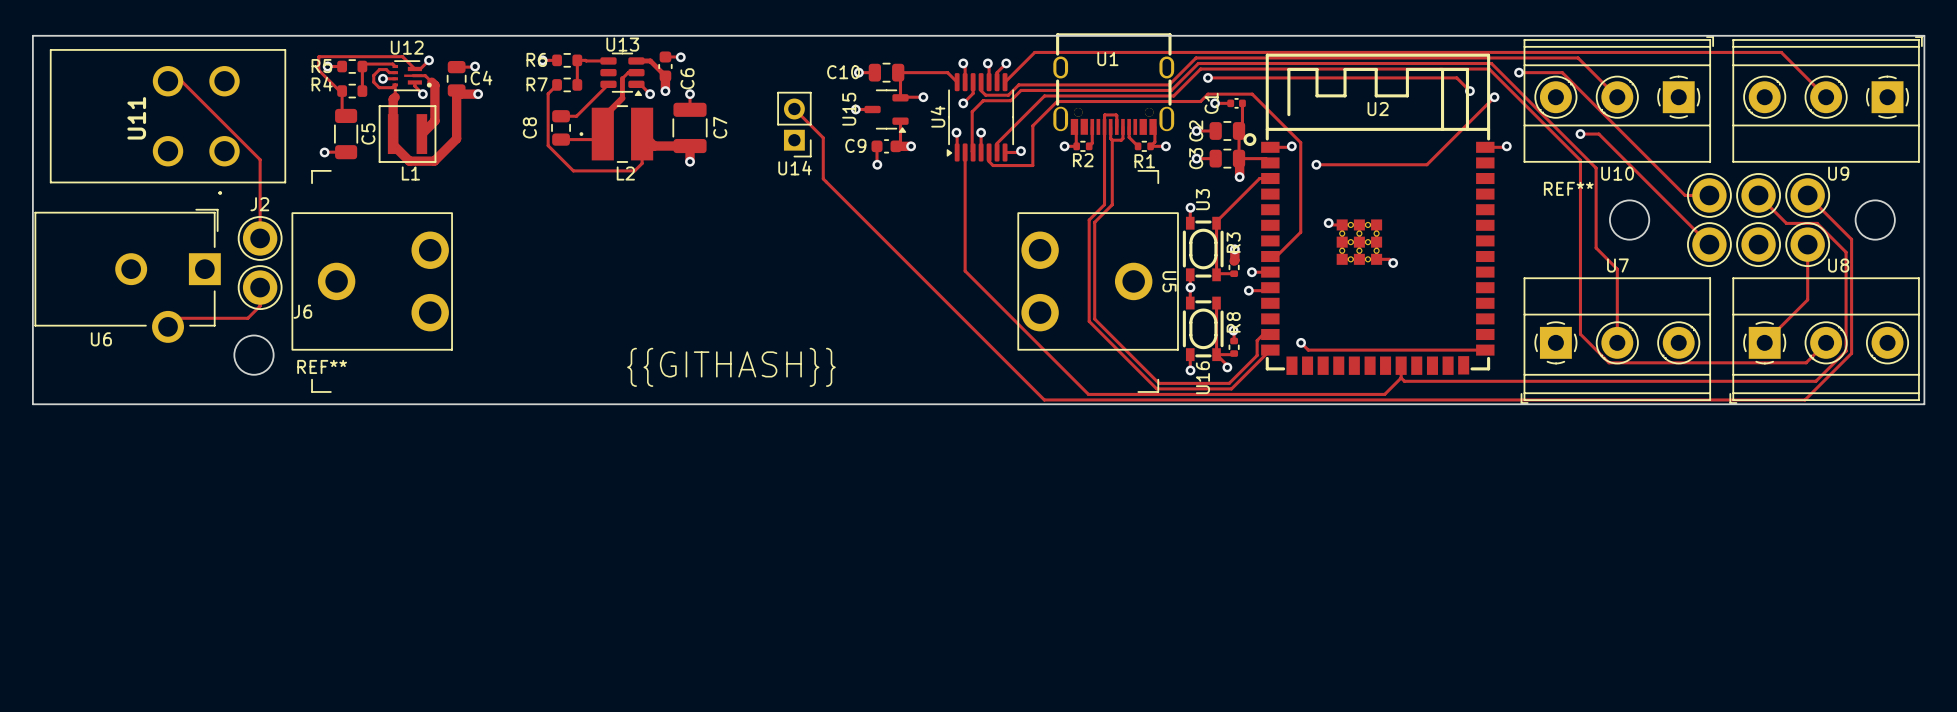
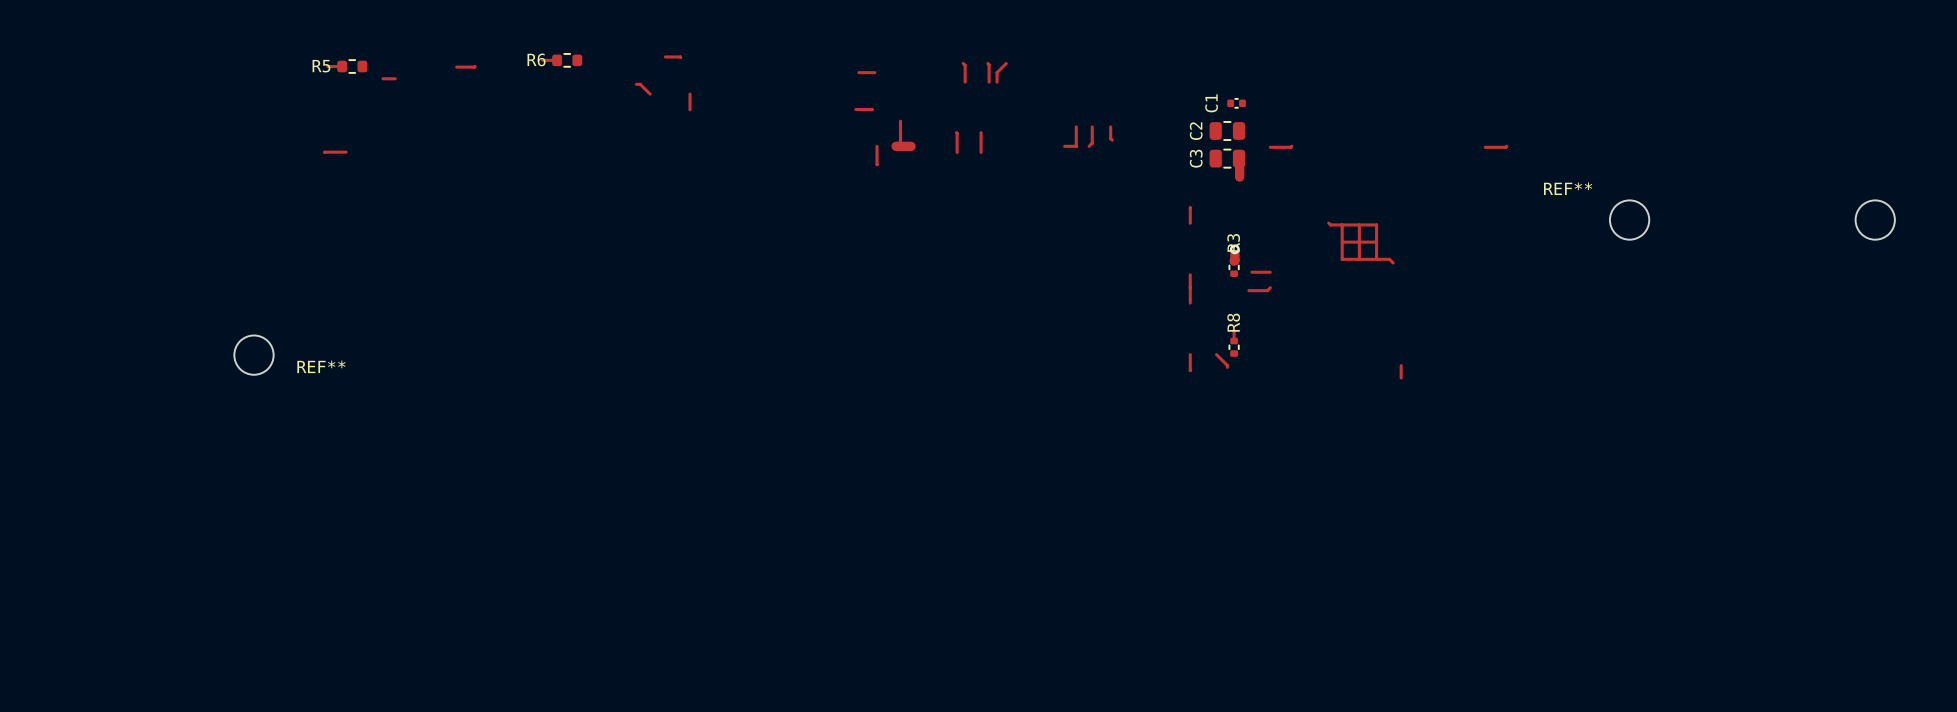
board edge: (32, 35) (1924, 35) (1924, 404) (32, 404) (32, 35) -> none
via: (680, 57) -> none
track: (429, 60) (420, 68) (414, 68) (402, 56) (319, 56) (318, 70) (339, 91) (342, 91) (342, 111) (346, 115) -> none
via: (429, 60) -> none
via: (542, 60) -> none
track: (608, 60) (577, 60) (577, 84) -> none
track: (636, 60) (650, 60) (665, 76) (665, 91) -> none
via: (963, 63) -> none
via: (987, 63) -> none
via: (1006, 63) -> none
via: (327, 66) -> none
track: (395, 66) (392, 64) (364, 64) (362, 66) (362, 91) -> none
via: (475, 66) -> none
C6: (665, 66) -> none
track: (395, 72) (379, 69) (373, 75) (373, 82) (379, 87) (392, 87) (395, 84) (395, 97) (393, 99) (393, 144) (409, 161) (434, 161) (456, 138) (456, 90) (460, 94) (478, 94) -> none
track: (636, 72) (628, 72) (622, 78) (622, 98) (602, 117) (602, 134) (597, 139) (561, 139) -> none
via: (858, 72) -> none
C10: (886, 72) -> none
track: (1519, 72) (1562, 72) (1685, 195) (1709, 195) -> none
via: (1519, 72) -> none
U13: (622, 74) -> none
U12: (412, 75) -> none
track: (413, 75) (425, 75) (434, 85) (434, 121) (421, 134) -> none
track: (1207, 77) (1456, 77) (1469, 91) -> none
via: (1207, 77) -> none
via: (382, 78) -> none
C4: (456, 78) -> none
track: (168, 81) (181, 81) (260, 159) (260, 238) -> none
track: (414, 82) (414, 86) (422, 94) -> none
track: (957, 82) (947, 72) (898, 72) (900, 74) (900, 97) (923, 97) -> none
track: (973, 82) (973, 93) (963, 103) -> none
track: (981, 82) (981, 90) (985, 95) (1008, 95) (1018, 84) (1169, 84) (1196, 57) (1578, 57) (1617, 97) -> none
track: (1005, 82) (1034, 52) (1781, 52) (1826, 97) -> none
track: (557, 84) (548, 93) (548, 145) (573, 170) (634, 170) (642, 163) (642, 134) (654, 146) (690, 146) (690, 161) -> none
R7: (567, 84) -> none
track: (608, 84) (576, 116) (561, 116) -> none
U1: (1113, 84) -> none
R4: (352, 91) -> none
via: (665, 91) -> none
via: (1469, 91) -> none
via: (422, 94) -> none
via: (478, 94) -> none
via: (650, 94) -> none
via: (690, 94) -> none
via: (923, 97) -> none
track: (1494, 97) (1426, 164) (1316, 164) -> none
via: (1494, 97) -> none
U10: (1618, 99) -> none
U9: (1827, 99) -> none
track: (983, 100) (972, 111) (973, 152) -> none
track: (983, 100) (1010, 100) (1021, 90) (1171, 90) (1198, 63) (1491, 63) (1596, 168) (1596, 247) (1617, 269) (1617, 342) -> none
via: (963, 103) -> none
track: (1215, 103) (1230, 103) -> none
via: (1215, 103) -> none
track: (1242, 103) (1242, 127) (1239, 130) (1239, 158) (1266, 158) (1270, 162) -> none
track: (794, 109) (823, 137) (823, 178) (1044, 399) (1805, 399) (1851, 353) (1851, 239) (1807, 195) -> none
via: (855, 109) -> none
U15: (886, 111) -> none
U4: (980, 117) -> none
U11: (168, 122) -> none
U14: (794, 124) -> none
track: (1116, 126) (1116, 114) (1104, 115) (1104, 204) (1089, 220) (1089, 321) (1156, 388) (1231, 388) (1270, 350) -> none
track: (1122, 126) (1122, 138) (1112, 140) (1112, 204) (1094, 222) (1094, 319) (1159, 383) (1229, 383) (1257, 355) (1257, 340) (1263, 334) (1270, 334) -> none
track: (1129, 126) (1129, 137) (1138, 146) -> none
track: (1154, 126) (1154, 142) (1150, 146) (1165, 146) -> none
C8: (561, 127) -> none
C7: (690, 127) -> none
track: (1196, 130) (1215, 130) -> none
via: (1196, 130) -> none
via: (956, 132) -> none
via: (981, 132) -> none
C5: (346, 134) -> none
L1: (407, 134) -> none
L2: (616, 134) -> none
track: (1580, 134) (1598, 134) (1709, 244) -> none
via: (1580, 134) -> none
C9: (886, 146) -> none
via: (911, 146) -> none
via: (1064, 146) -> none
R2: (1082, 146) -> none
R1: (1144, 146) -> none
via: (1165, 146) -> none
via: (1291, 146) -> none
via: (1506, 146) -> none
track: (1021, 151) (1005, 152) -> none
via: (1021, 151) -> none
via: (324, 152) -> none
track: (965, 152) (965, 271) (1088, 394) (1384, 394) (1401, 377) (1404, 381) (1815, 381) (1846, 351) (1846, 252) (1817, 223) (1786, 223) (1758, 195) -> none
track: (989, 152) (989, 161) (993, 165) (1032, 165) (1032, 125) (1057, 101) (1200, 101) (1208, 94) (1252, 94) (1300, 142) (1300, 232) (1276, 256) (1270, 256) -> none
track: (997, 152) (997, 143) (1044, 95) (1173, 95) (1200, 69) (1489, 69) (1580, 160) (1580, 334) (1609, 362) (1806, 362) (1826, 342) -> none
track: (1196, 158) (1215, 158) -> none
via: (1196, 158) -> none
via: (690, 161) -> none
via: (877, 164) -> none
via: (1316, 164) -> none
via: (1239, 177) -> none
track: (1270, 178) (1259, 178) (1216, 221) (1216, 274) (1234, 273) -> none
part: (1709, 195) -> none
part: (1758, 195) -> none
part: (1807, 195) -> none
via: (1190, 207) -> none
U2: (1369, 214) -> none
via: (1328, 223) -> none
J2: (260, 238) -> none
part: (1709, 244) -> none
part: (1758, 244) -> none
track: (1807, 244) (1807, 299) (1764, 342) -> none
part: (1807, 244) -> none
U3: (1203, 249) -> none
via: (1393, 263) -> none
via: (1251, 272) -> none
U6: (127, 275) -> none
U5: (735, 281) -> none
track: (260, 287) (260, 306) (247, 318) (176, 318) (168, 326) -> none
J6: (260, 287) -> none
via: (1190, 287) -> none
via: (1248, 290) -> none
track: (1216, 303) (1216, 354) (1234, 353) -> none
U16: (1203, 328) -> none
via: (1233, 330) -> none
U7: (1615, 340) -> none
U8: (1824, 340) -> none
track: (1301, 342) (1308, 350) (1485, 350) -> none
via: (1301, 342) -> none
text: {{GITHASH}} (731, 367) -> none
via: (1227, 367) -> none
via: (1190, 370) -> none

